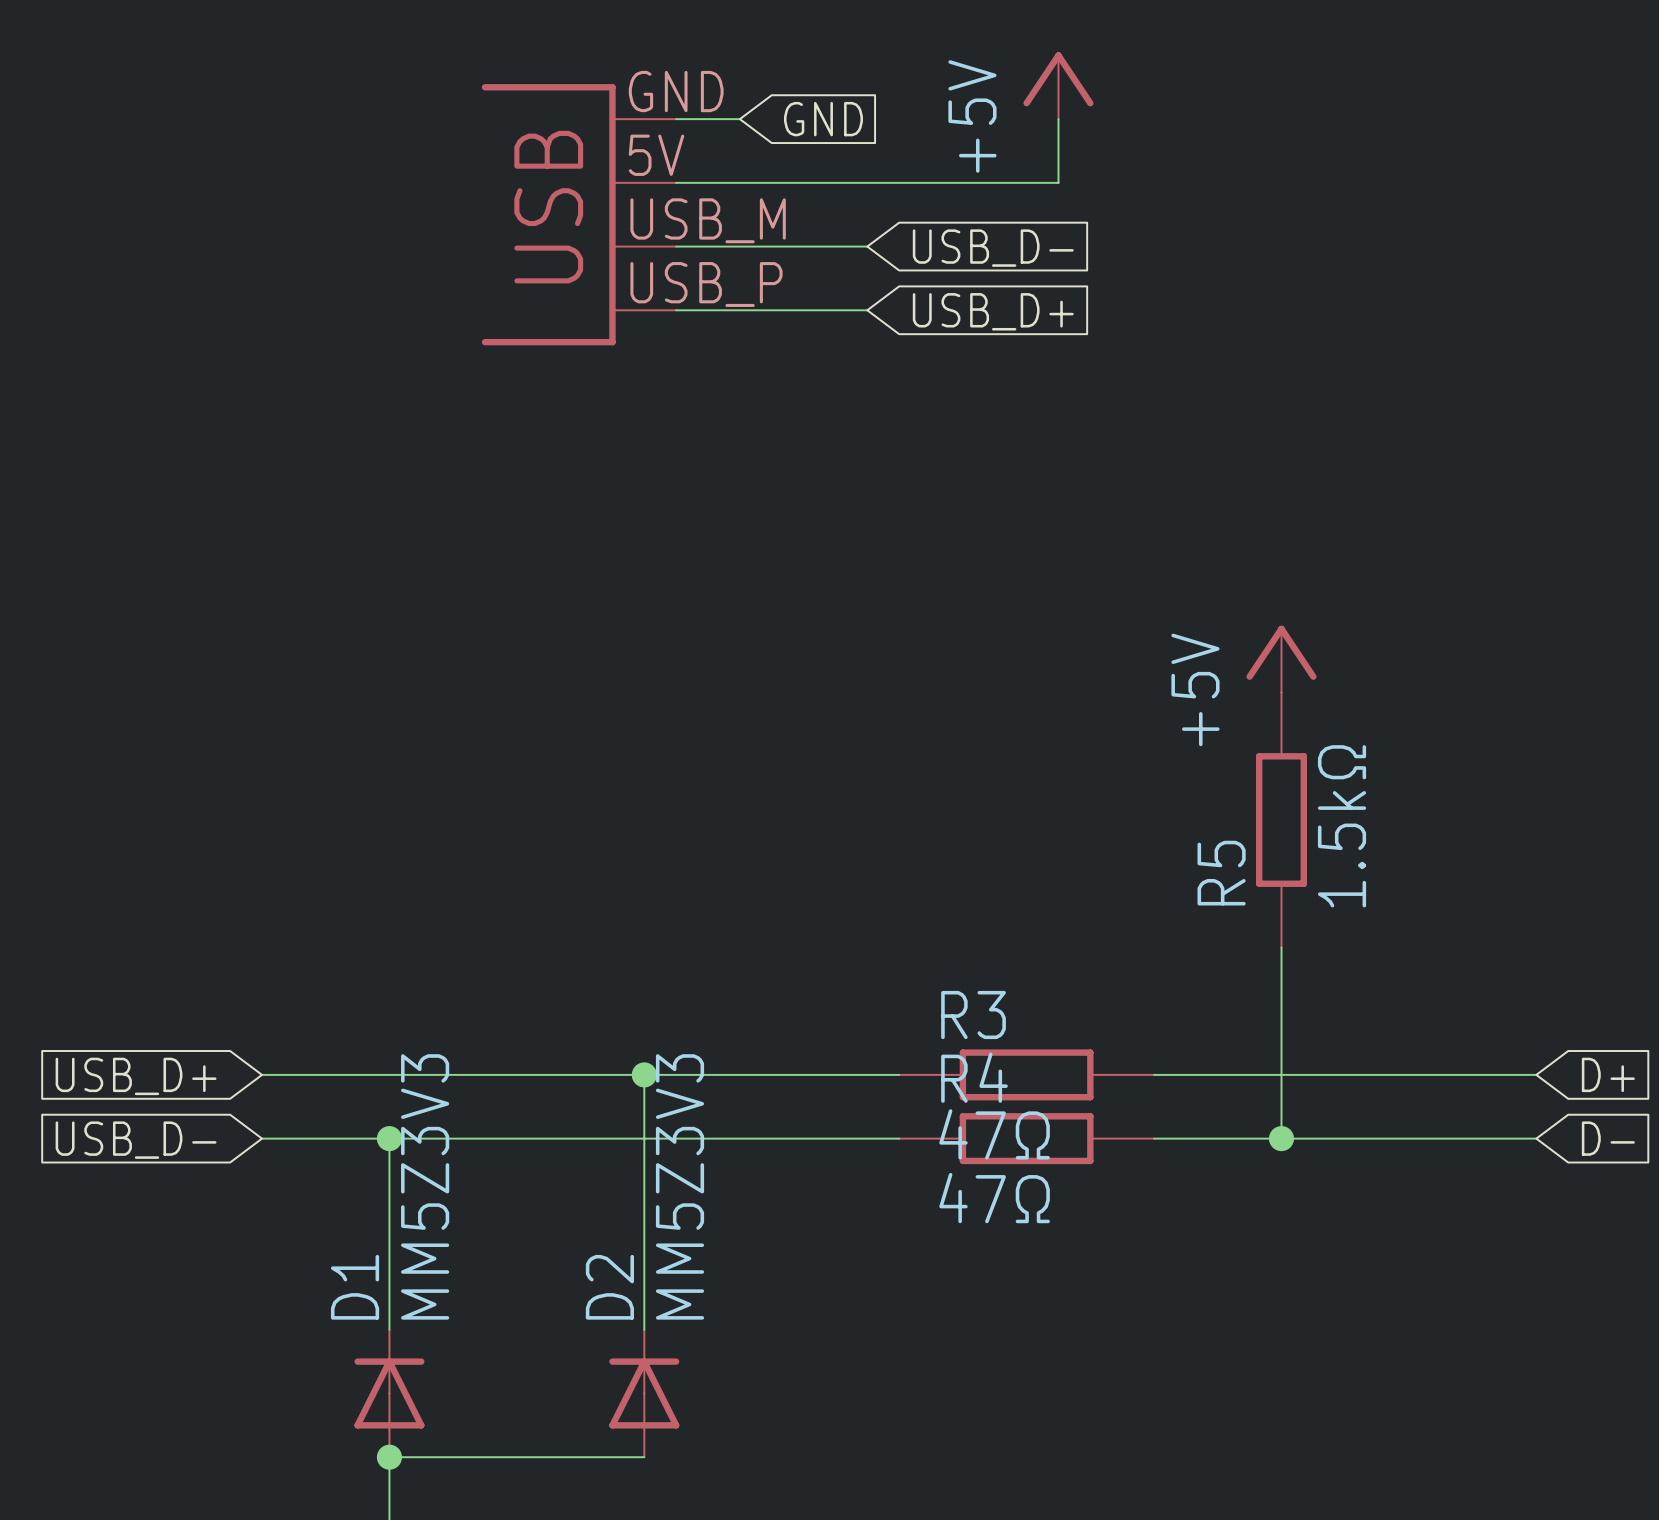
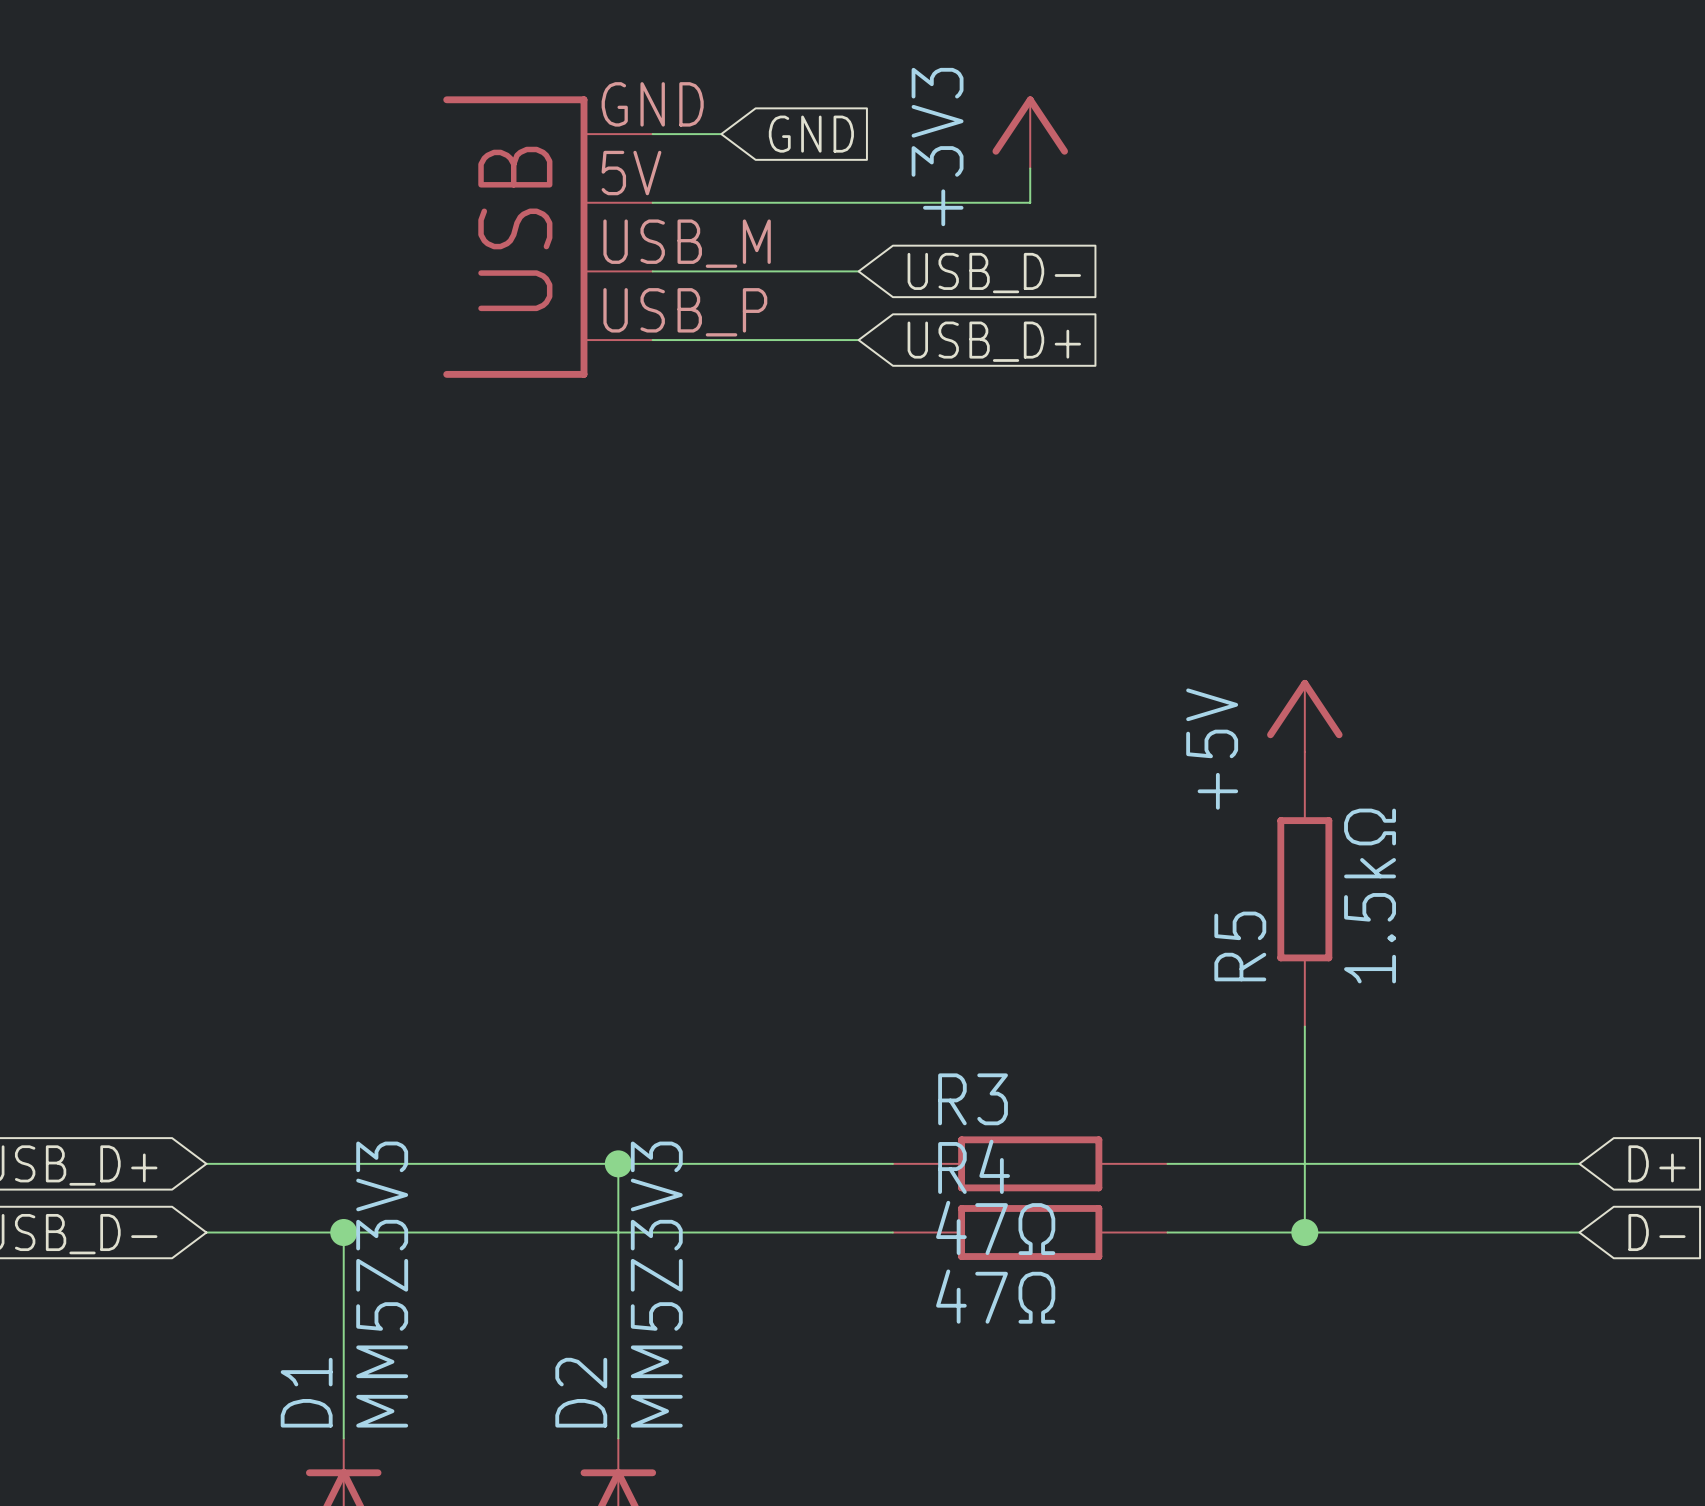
power symbol: +5V (1058, 85) -> none
power symbol: none -> +3V3 (1030, 132)
wire: (1058, 119) (1058, 182) (1026, 182) -> (1030, 168) (1030, 202)

